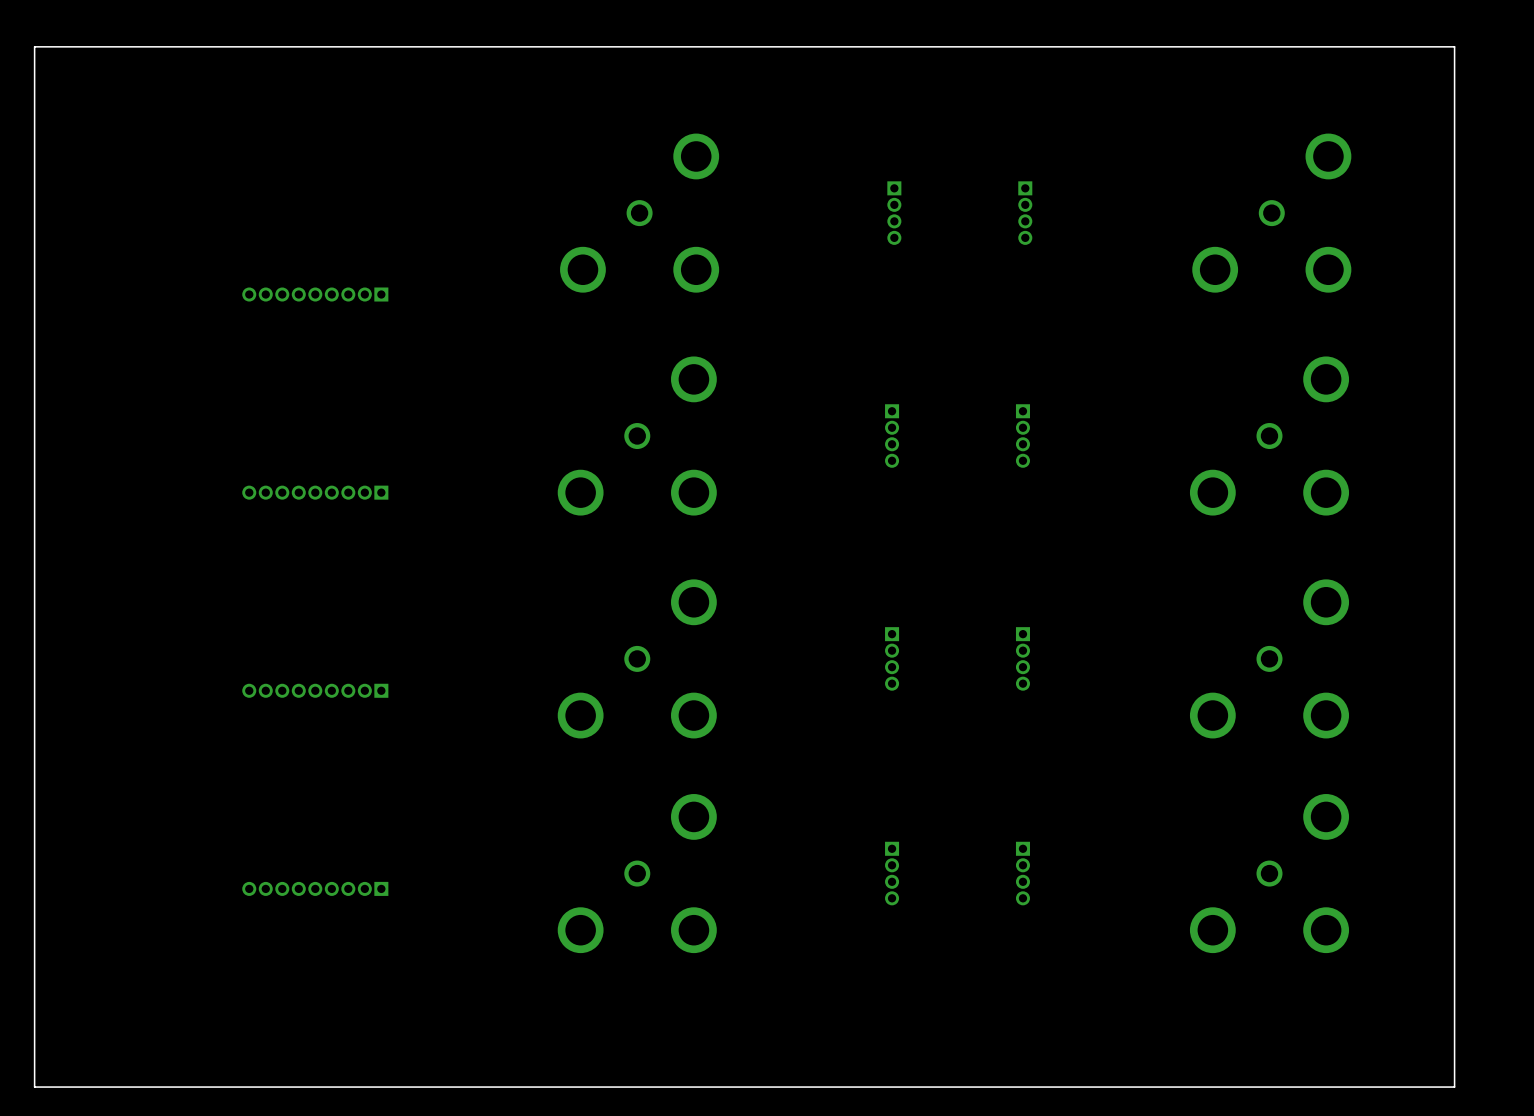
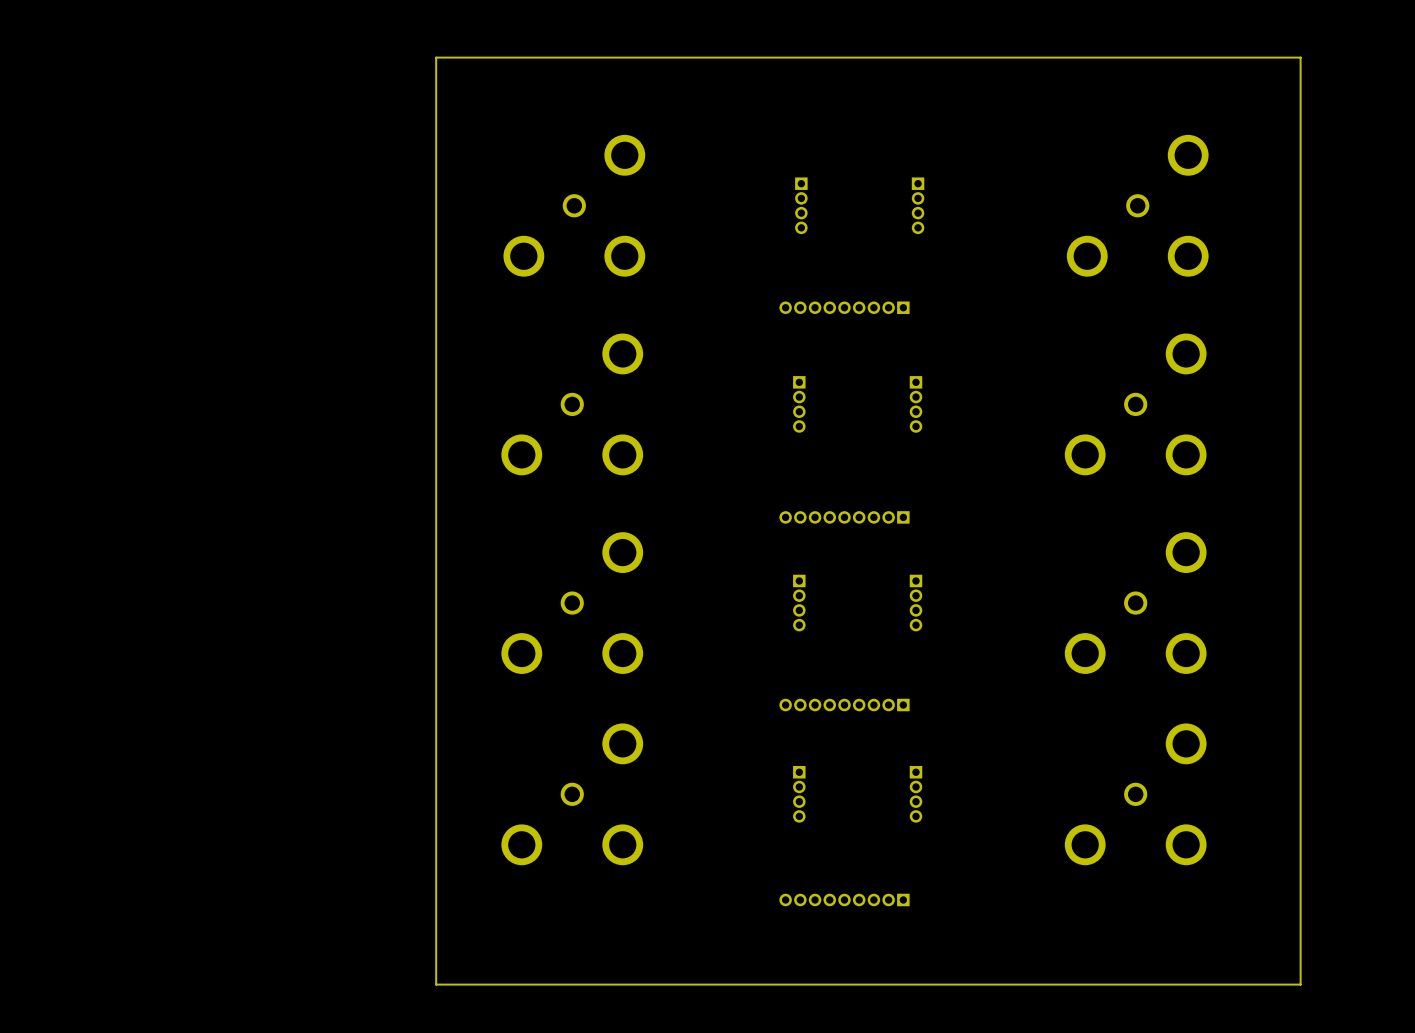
board edge: (484, 46) (34, 46) (34, 1087) (484, 1087) -> (436, 57) (436, 984)
part: (315, 294) -> none
part: none -> (844, 307)
part: (315, 492) -> none
part: none -> (844, 517)
part: (315, 690) -> none
part: none -> (844, 705)
part: (315, 888) -> none
part: none -> (844, 899)

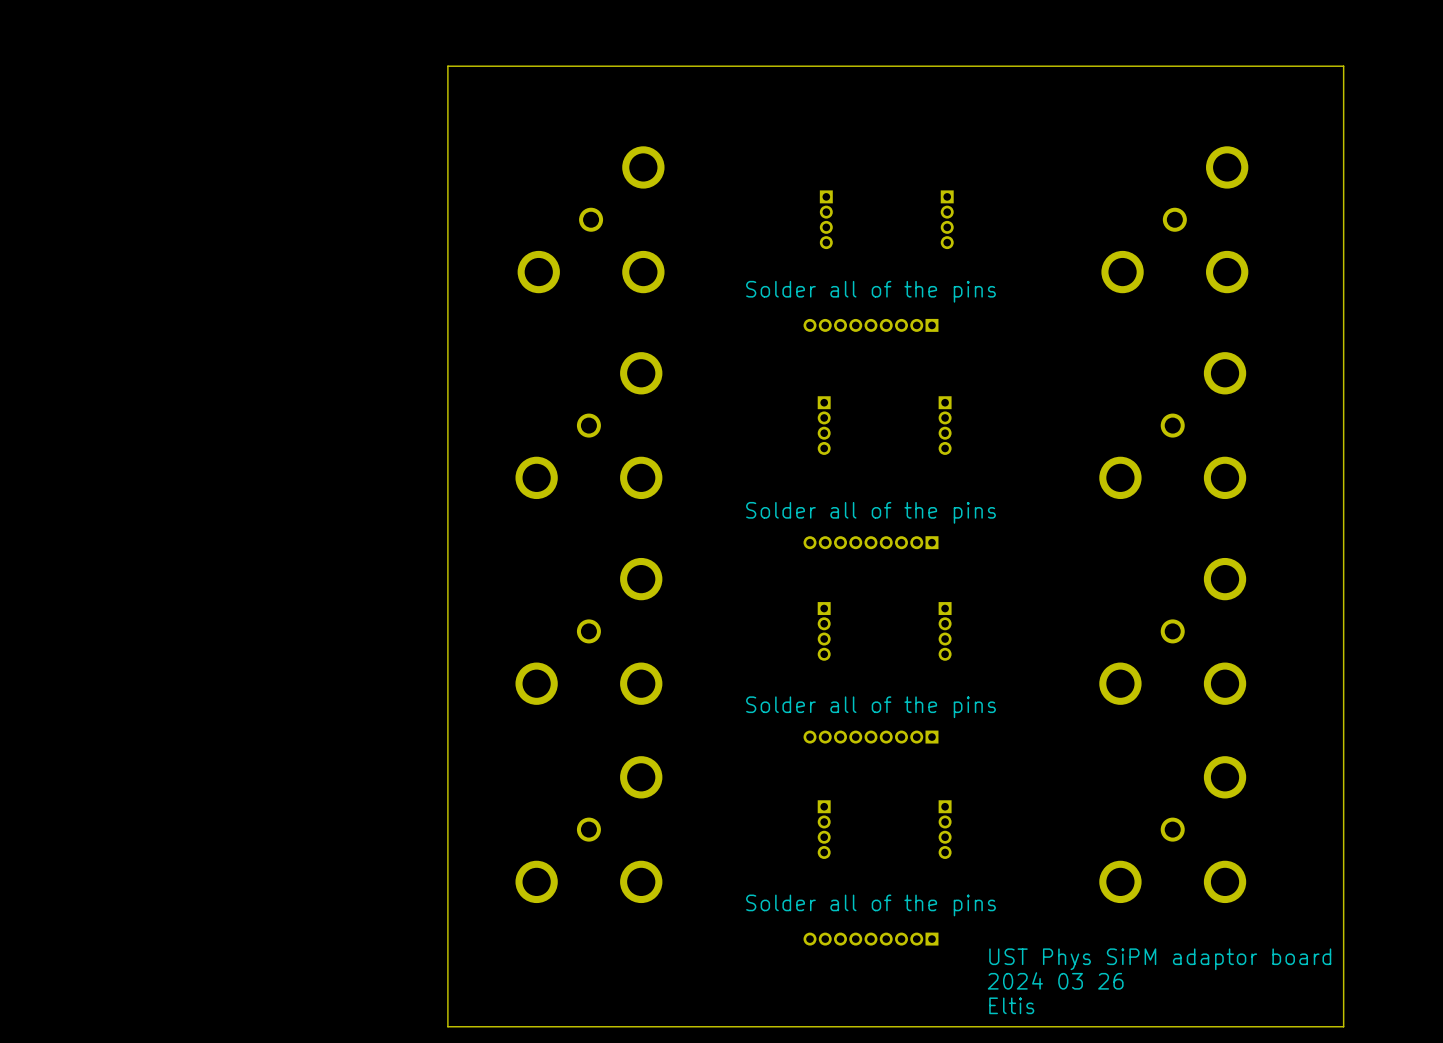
text: none -> Solder all of the pins (871, 291)
text: none -> Solder all of the pins (871, 512)
text: none -> Solder all of the pins (871, 707)
text: none -> Solder all of the pins (871, 905)
text: none -> UST Phys SiPM adaptor board (1160, 959)
text: none -> 2024 03 26 (1055, 980)
text: none -> Eltis (1011, 1005)

